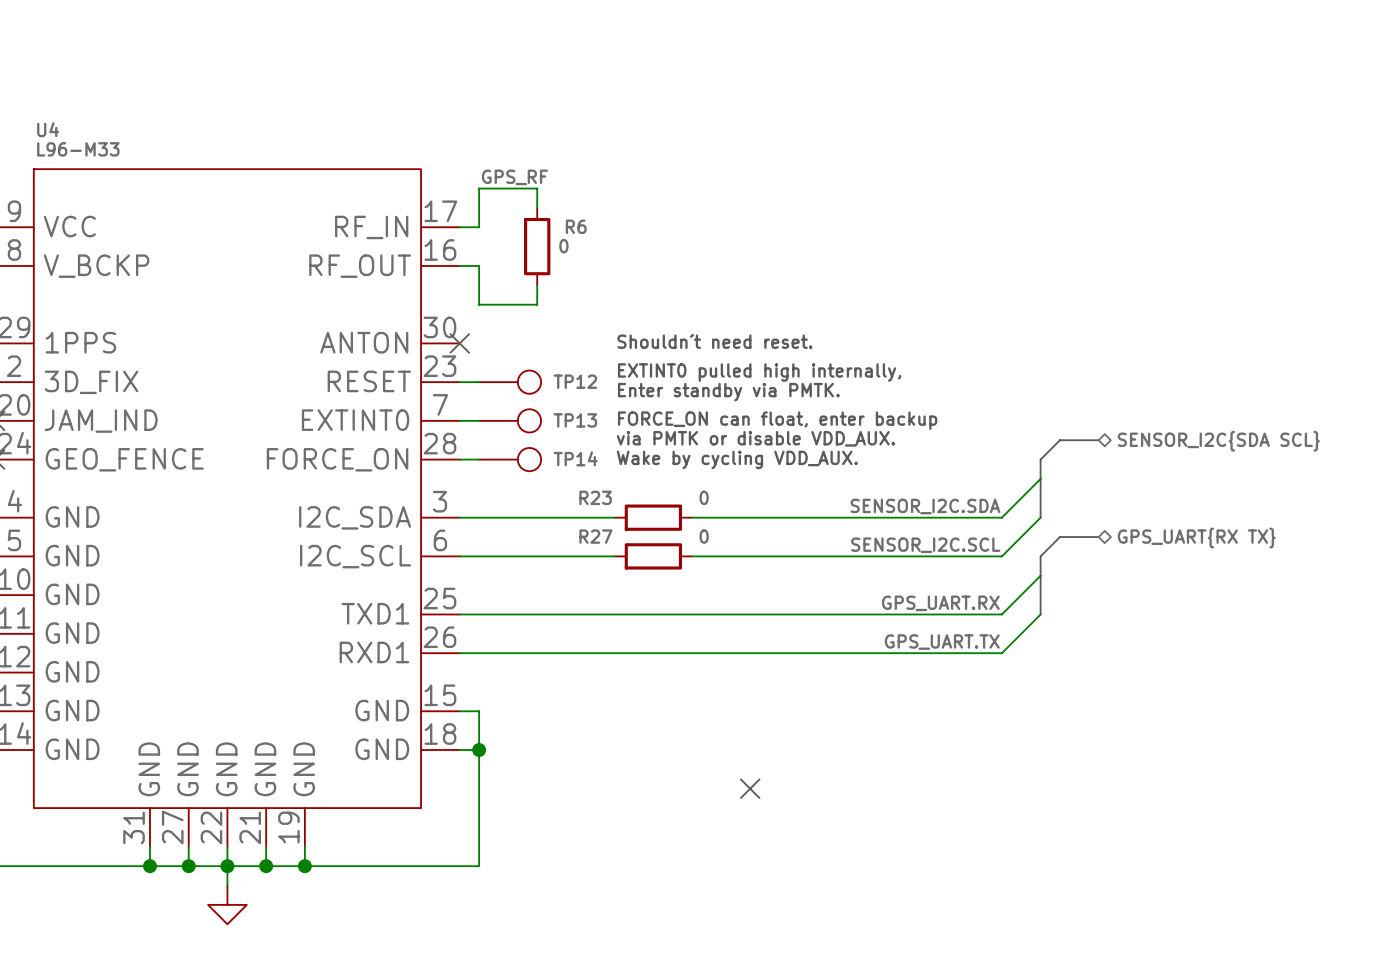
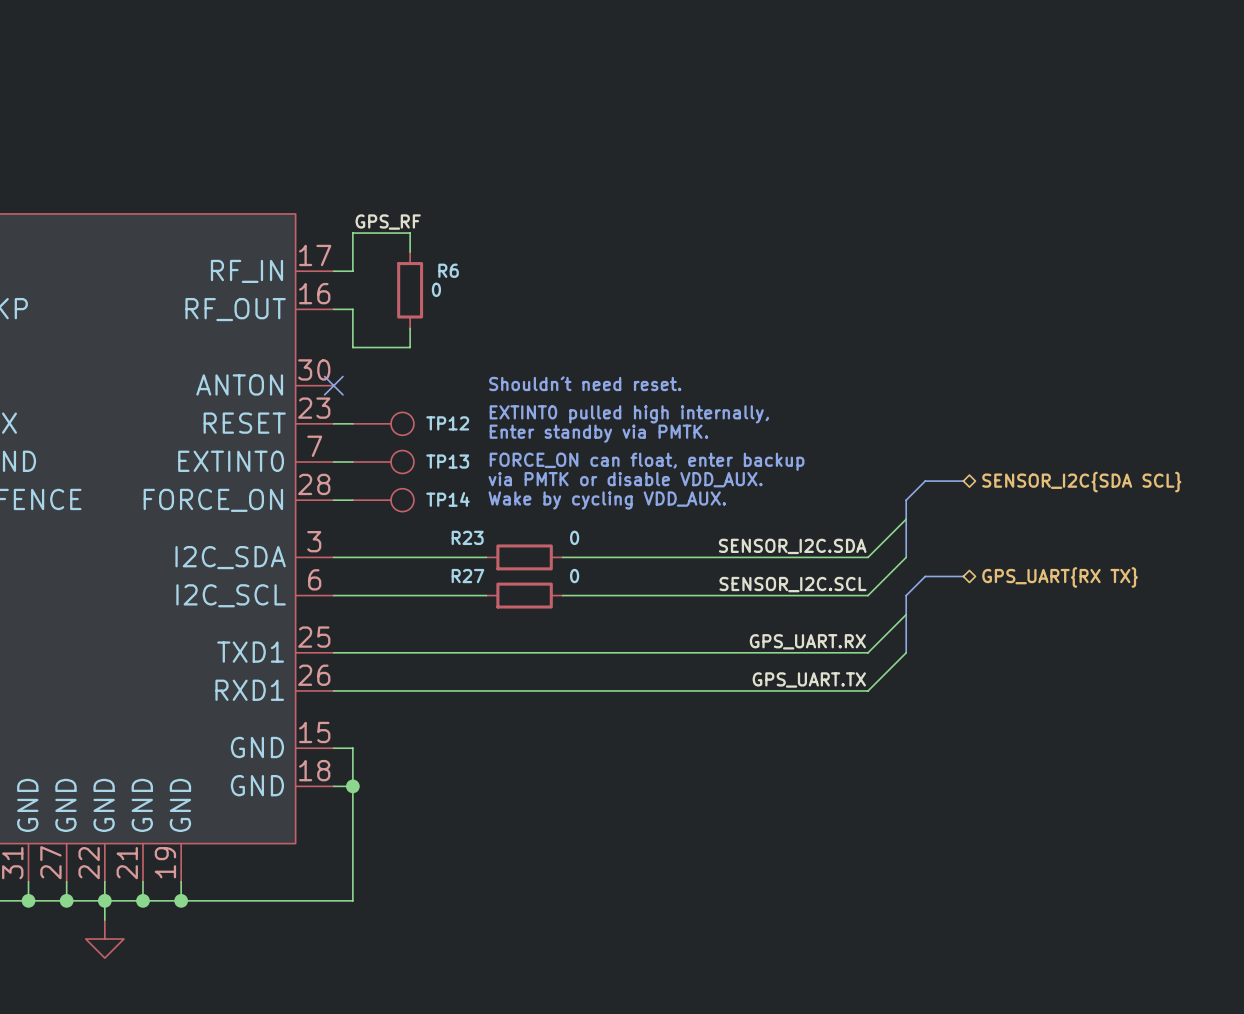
no-connect mark: (750, 788) -> none

